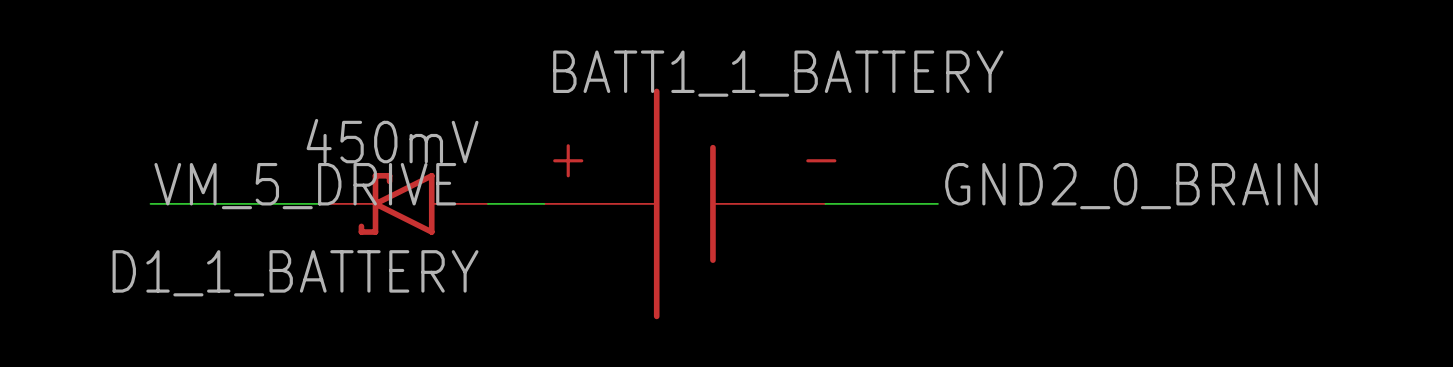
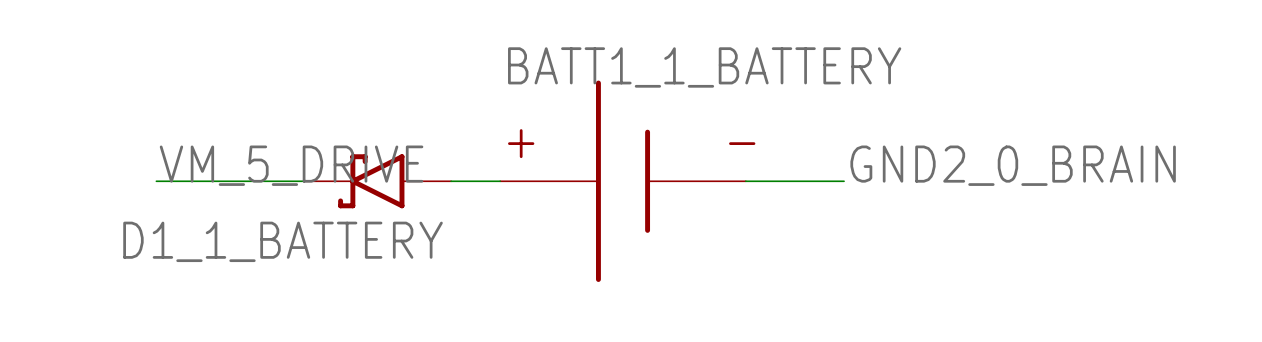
D1_1_BATTERY value: 450mV (392, 141) -> none

